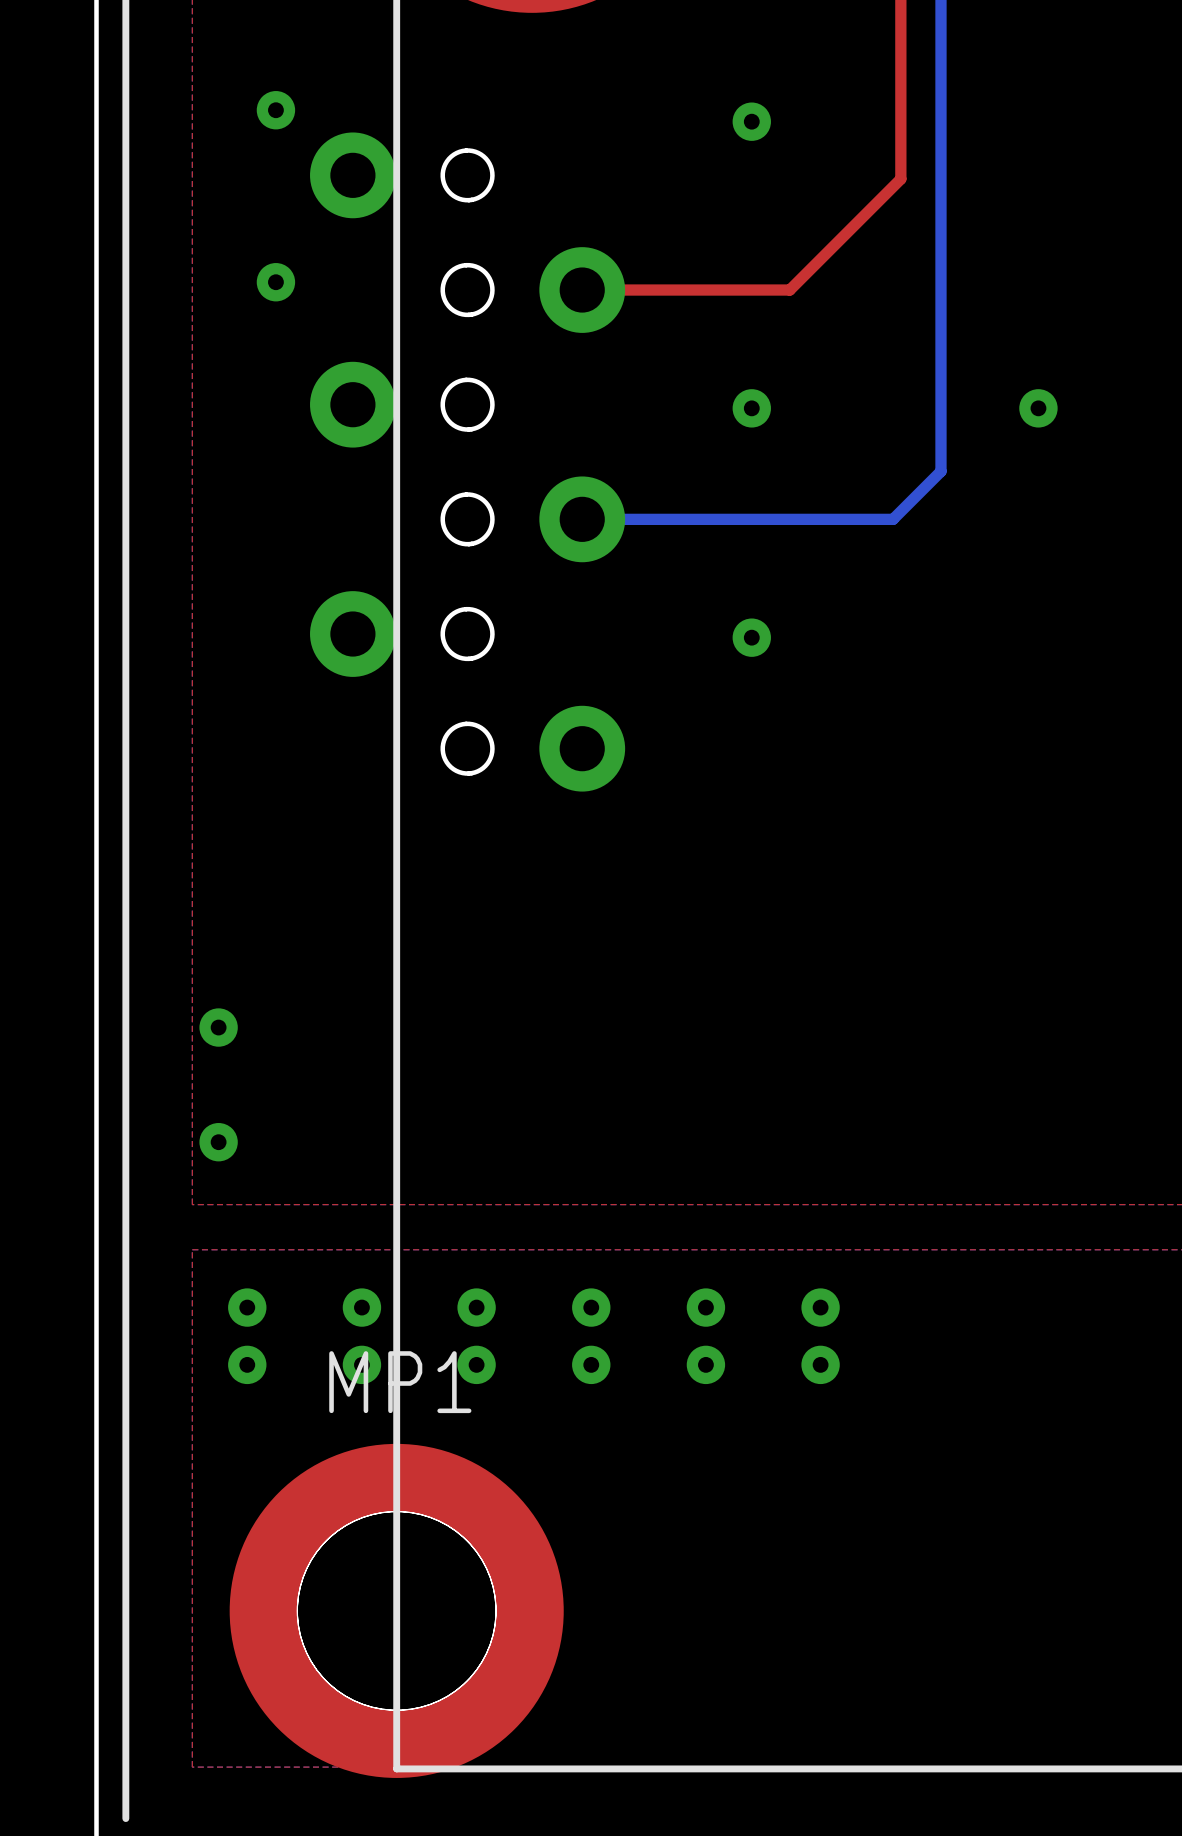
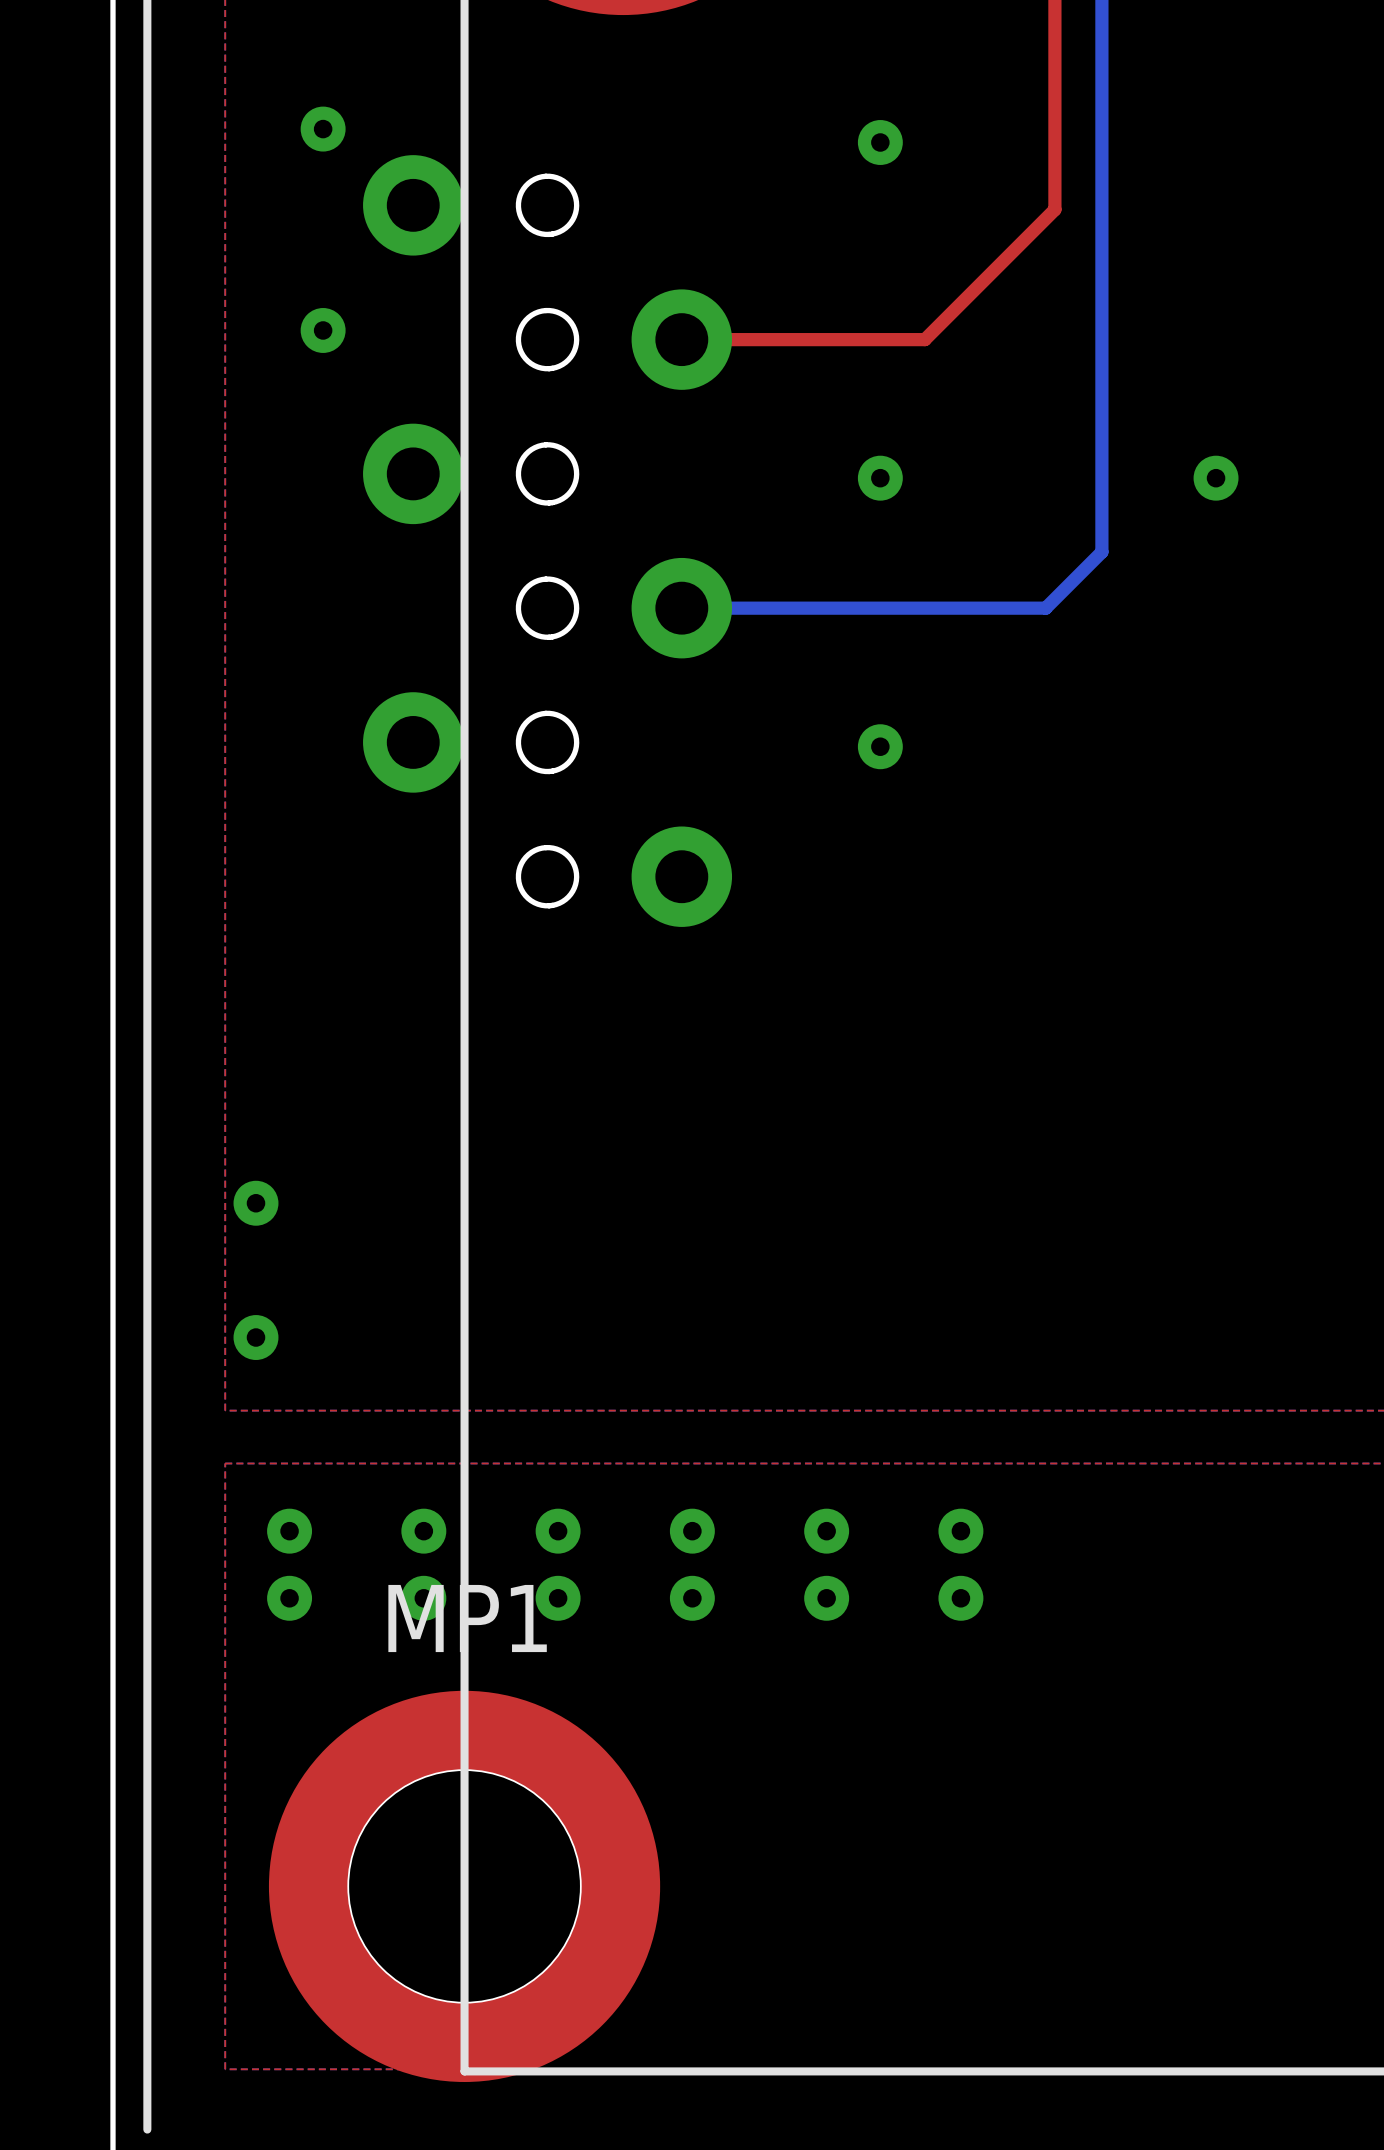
hole: (396, 1610) -> none

